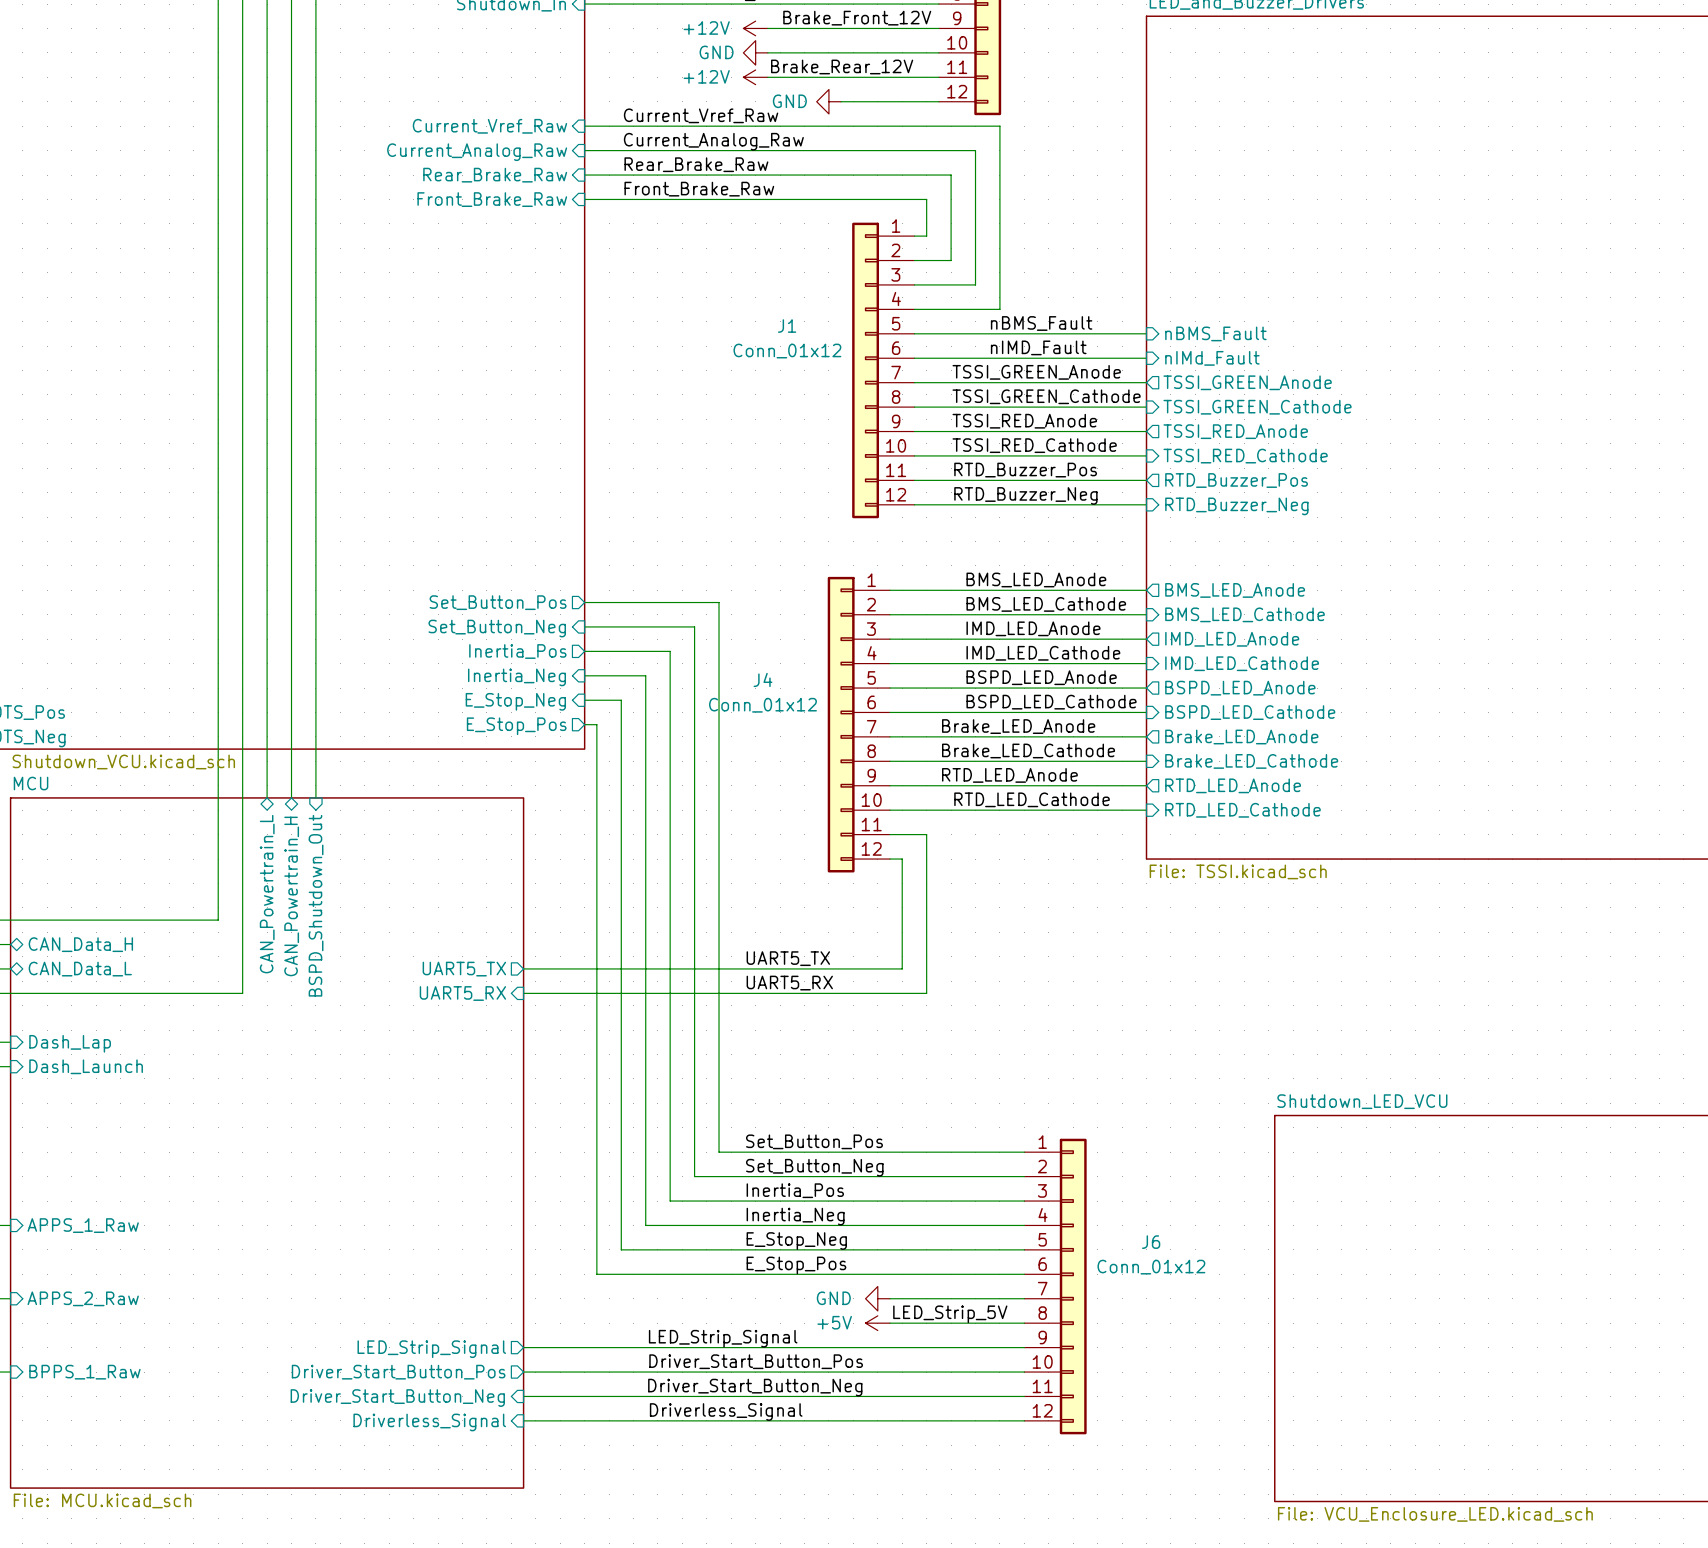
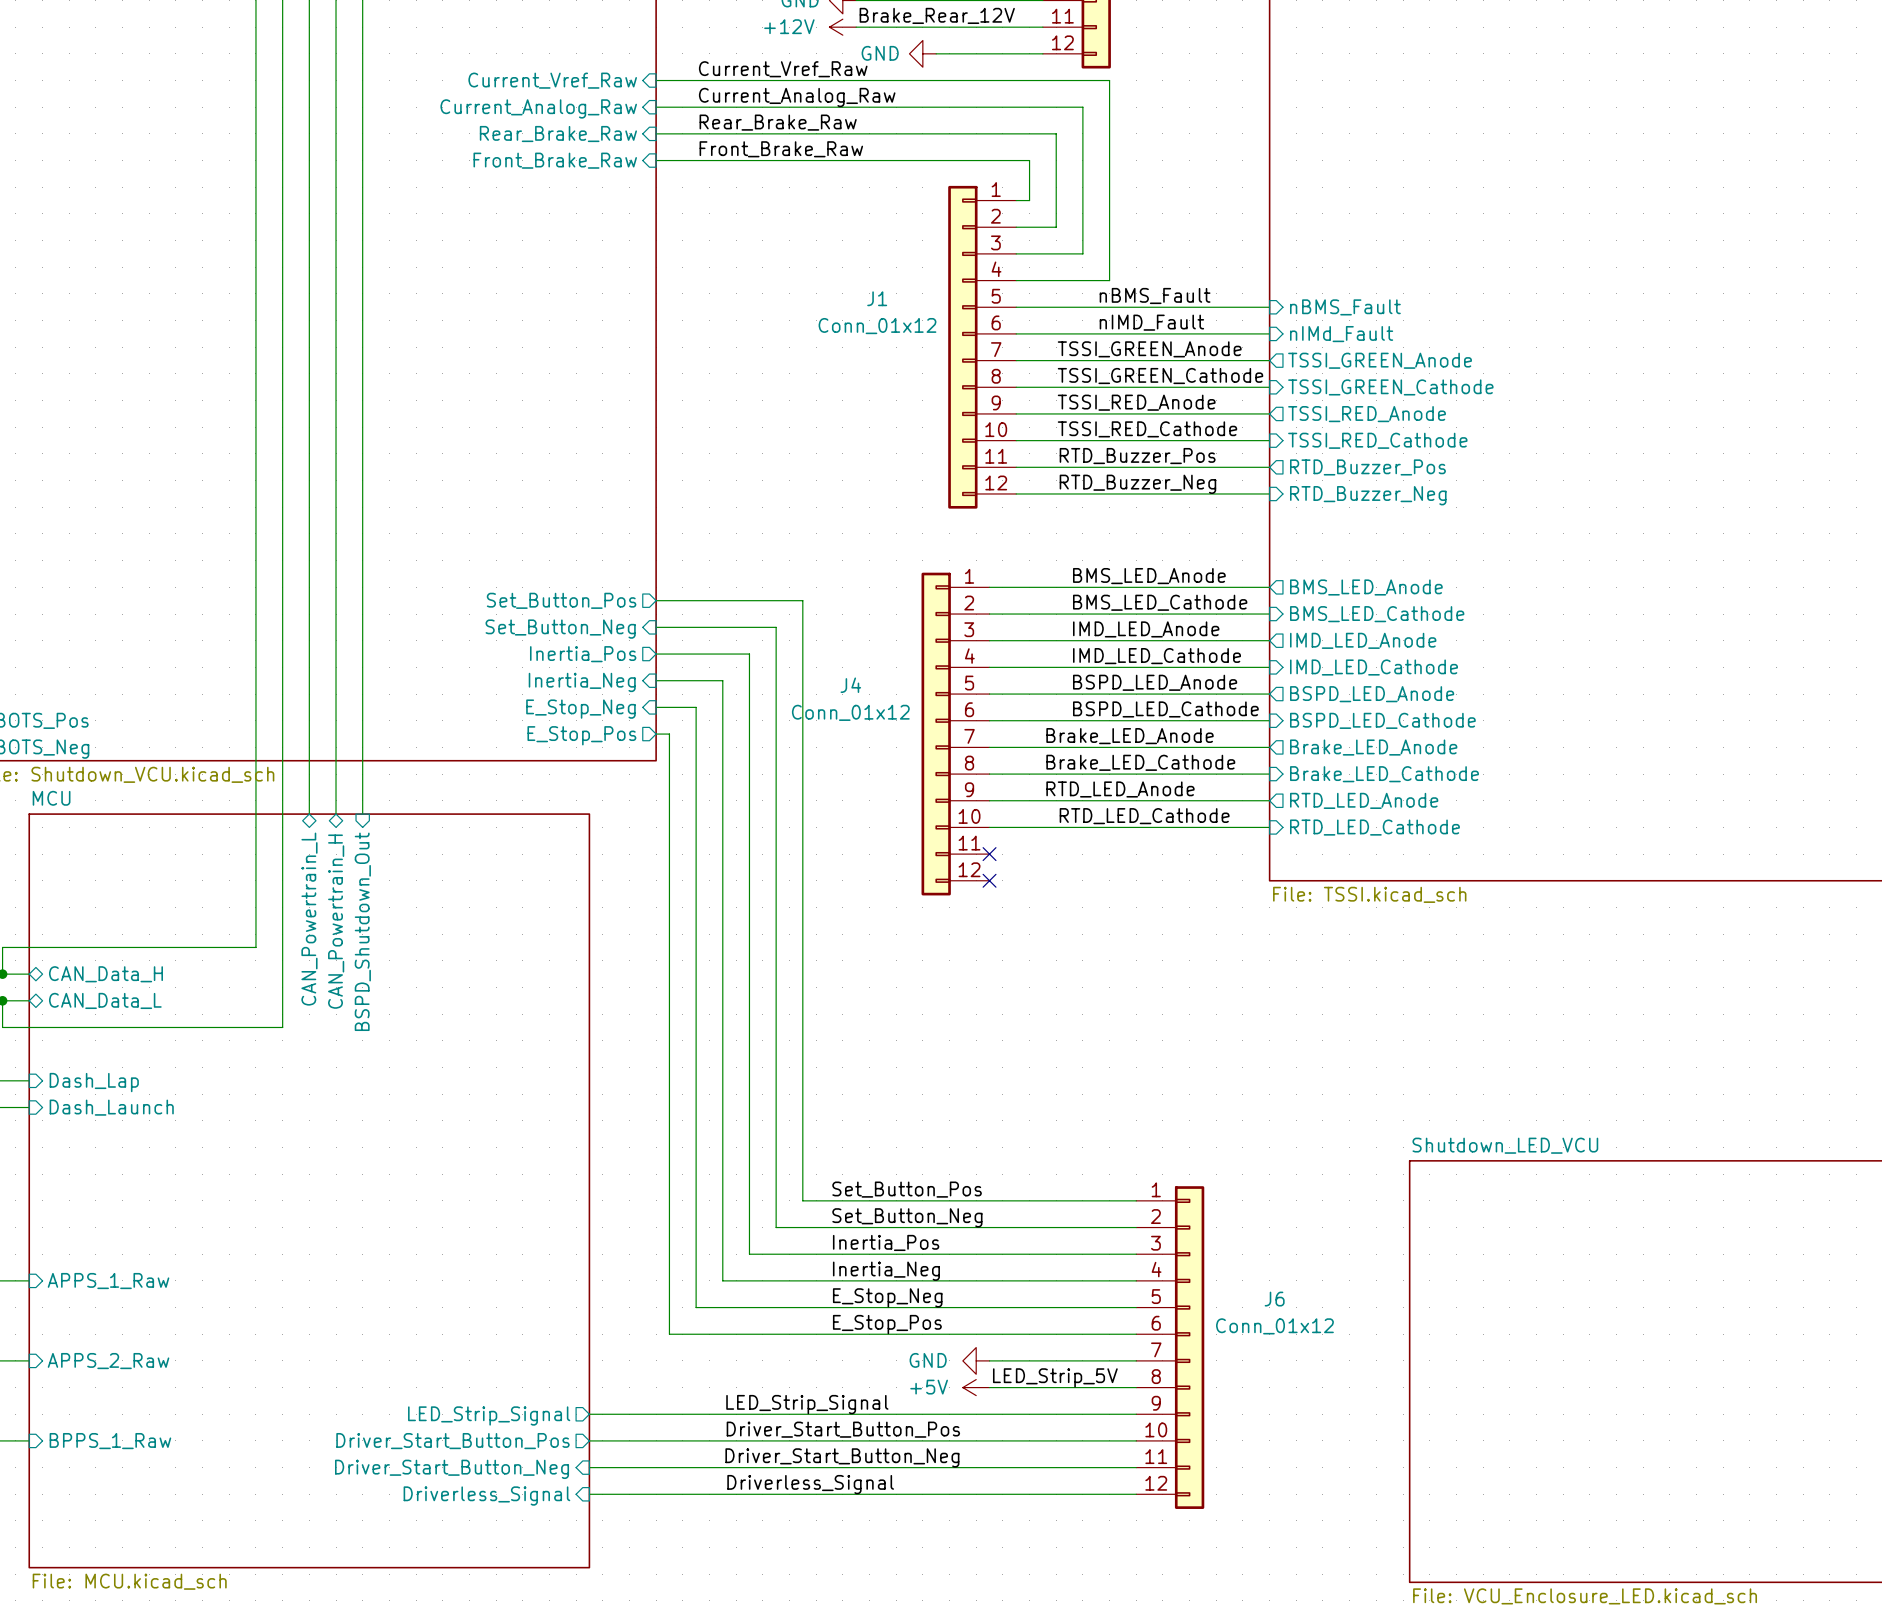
wire: (890, 834) (926, 834) (926, 993) (523, 993) -> none
no-connect mark: none -> (989, 854)
wire: (890, 859) (902, 859) (902, 968) (523, 968) -> none
no-connect mark: none -> (989, 880)
label: UART5_TX (788, 958) -> none
sheet pin: UART5_TX (464, 969) -> none
label: UART5_RX (789, 983) -> none
sheet pin: UART5_RX (462, 993) -> none

